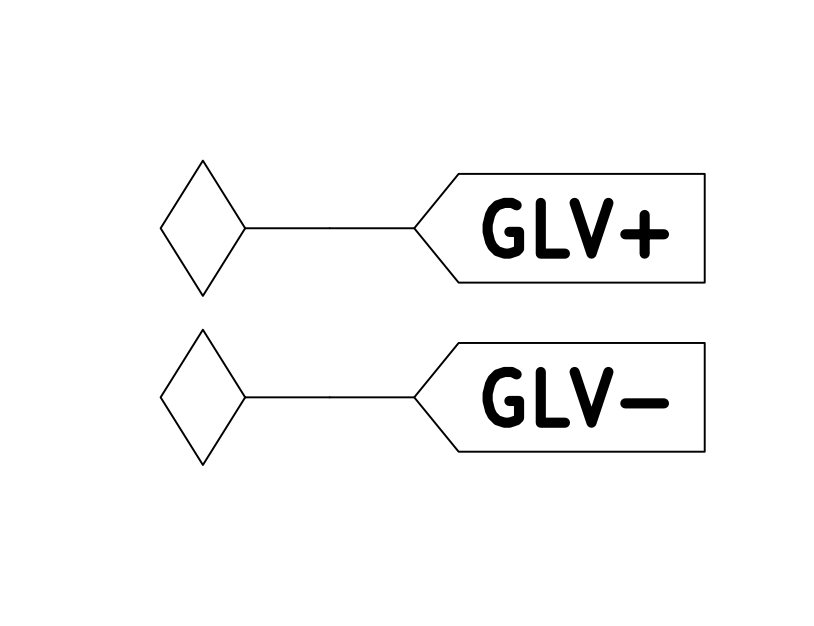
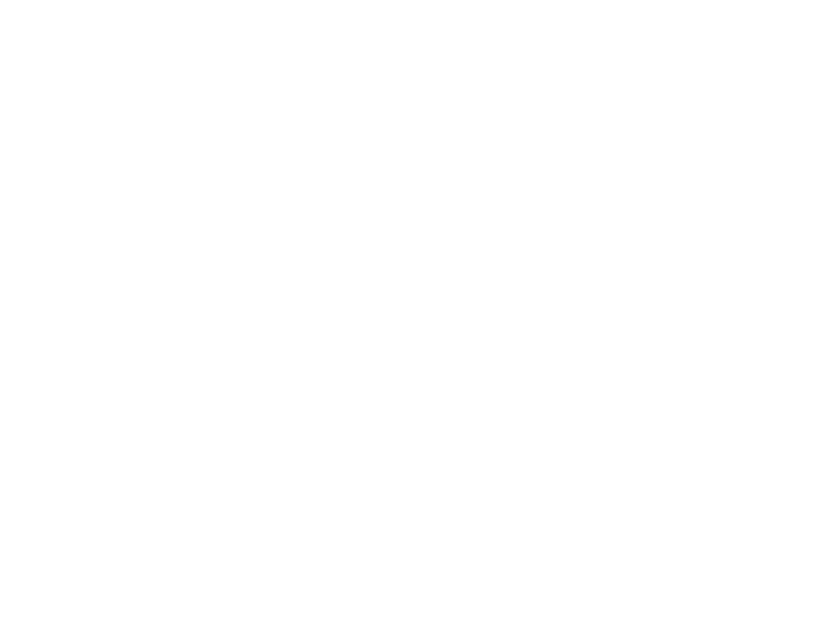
power symbol: (245, 228) -> none
wire: (329, 228) (414, 228) -> none
global label: GLV+ (575, 228) -> none
power symbol: (245, 397) -> none
wire: (329, 397) (414, 397) -> none
global label: GLV- (575, 397) -> none

